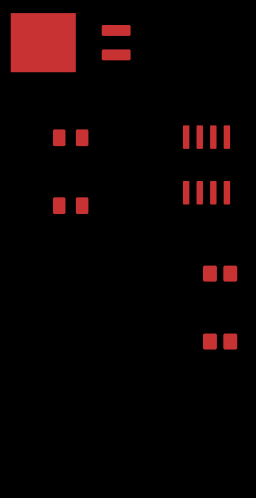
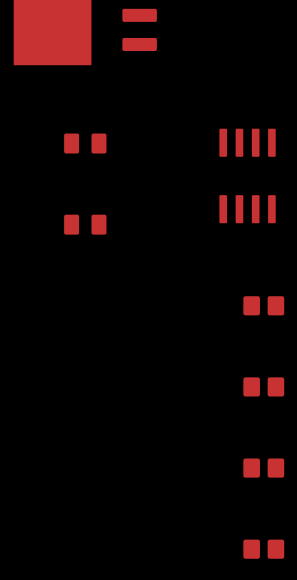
part: none -> (263, 468)
part: none -> (263, 549)

